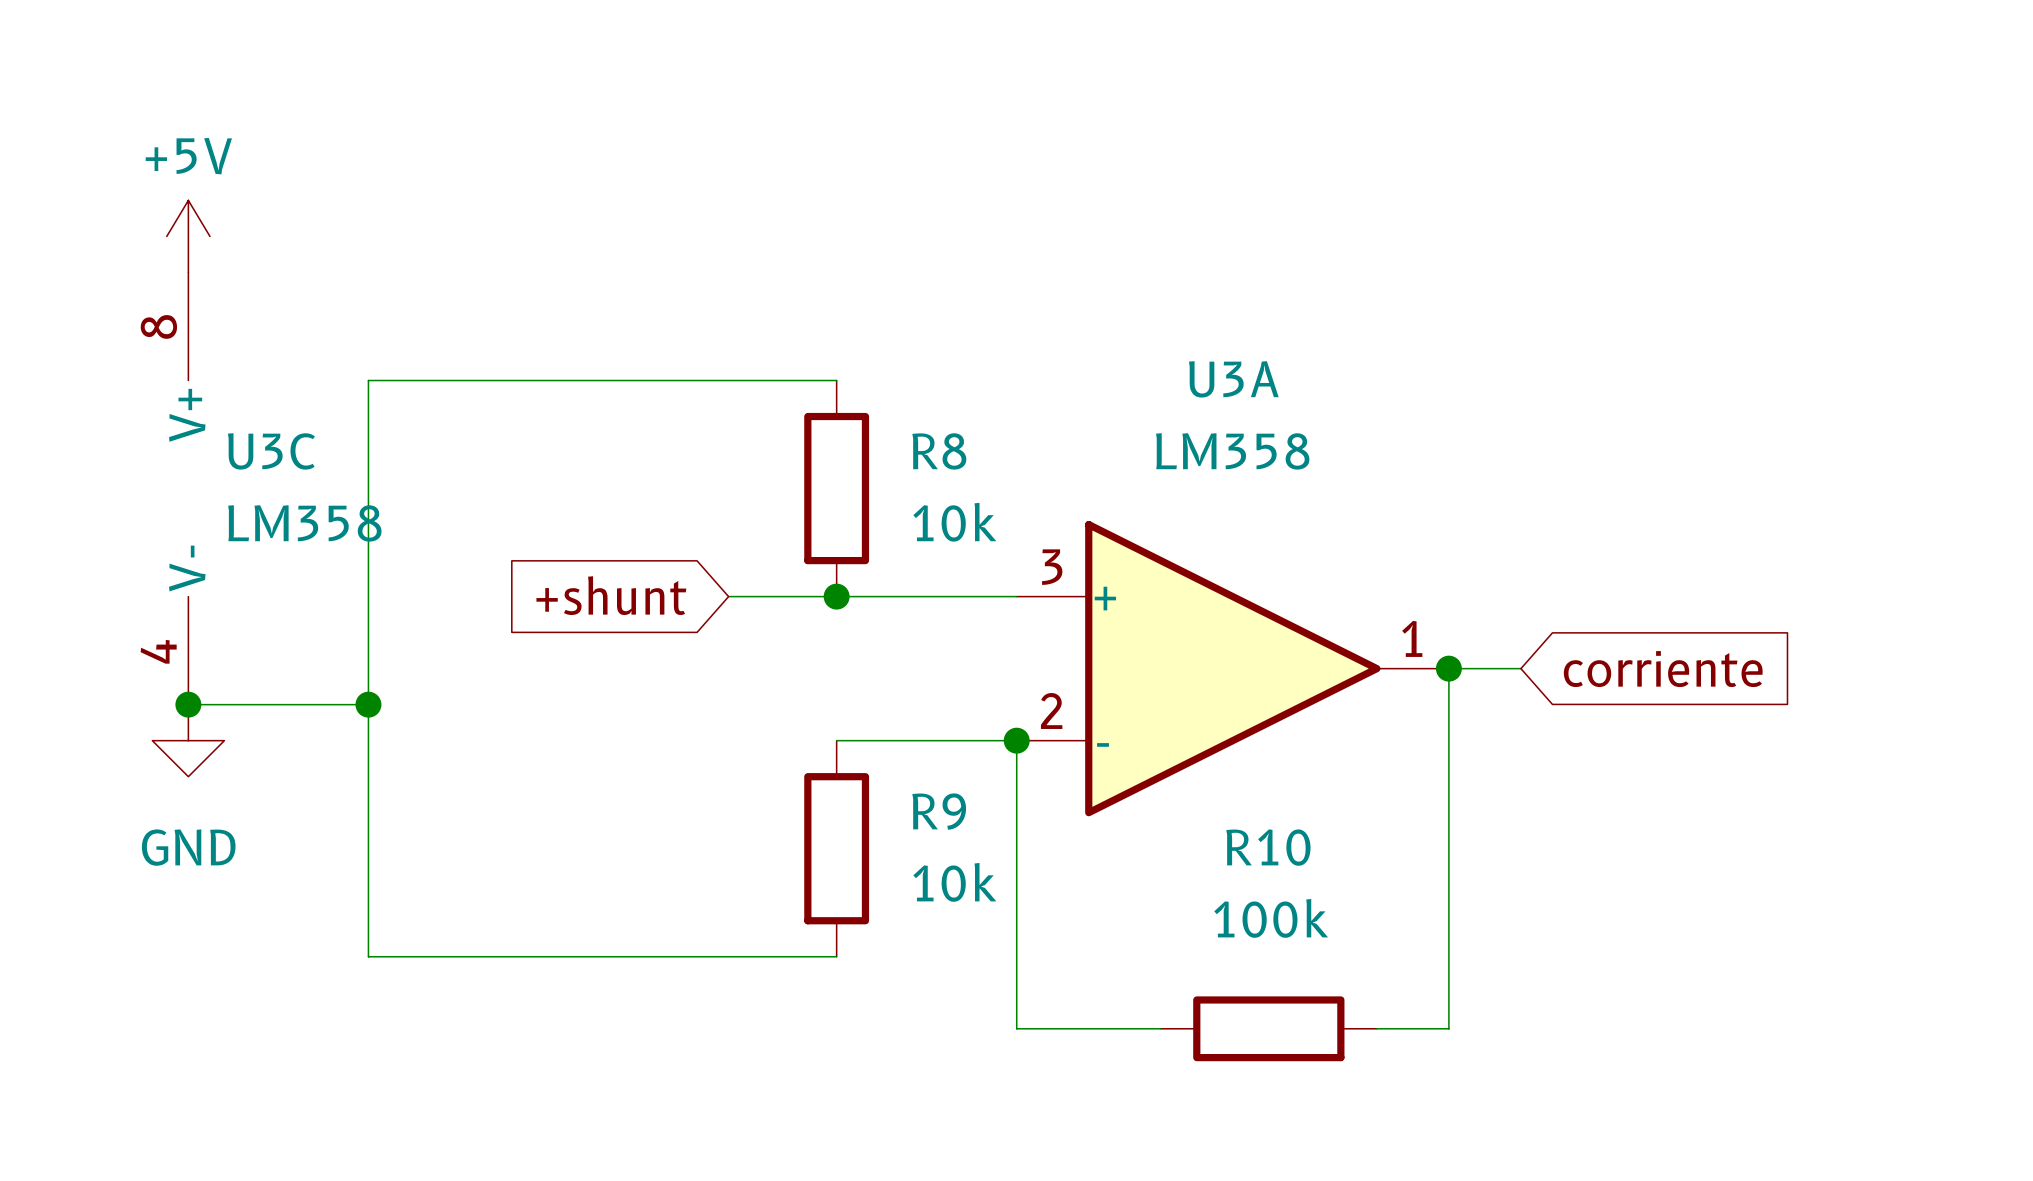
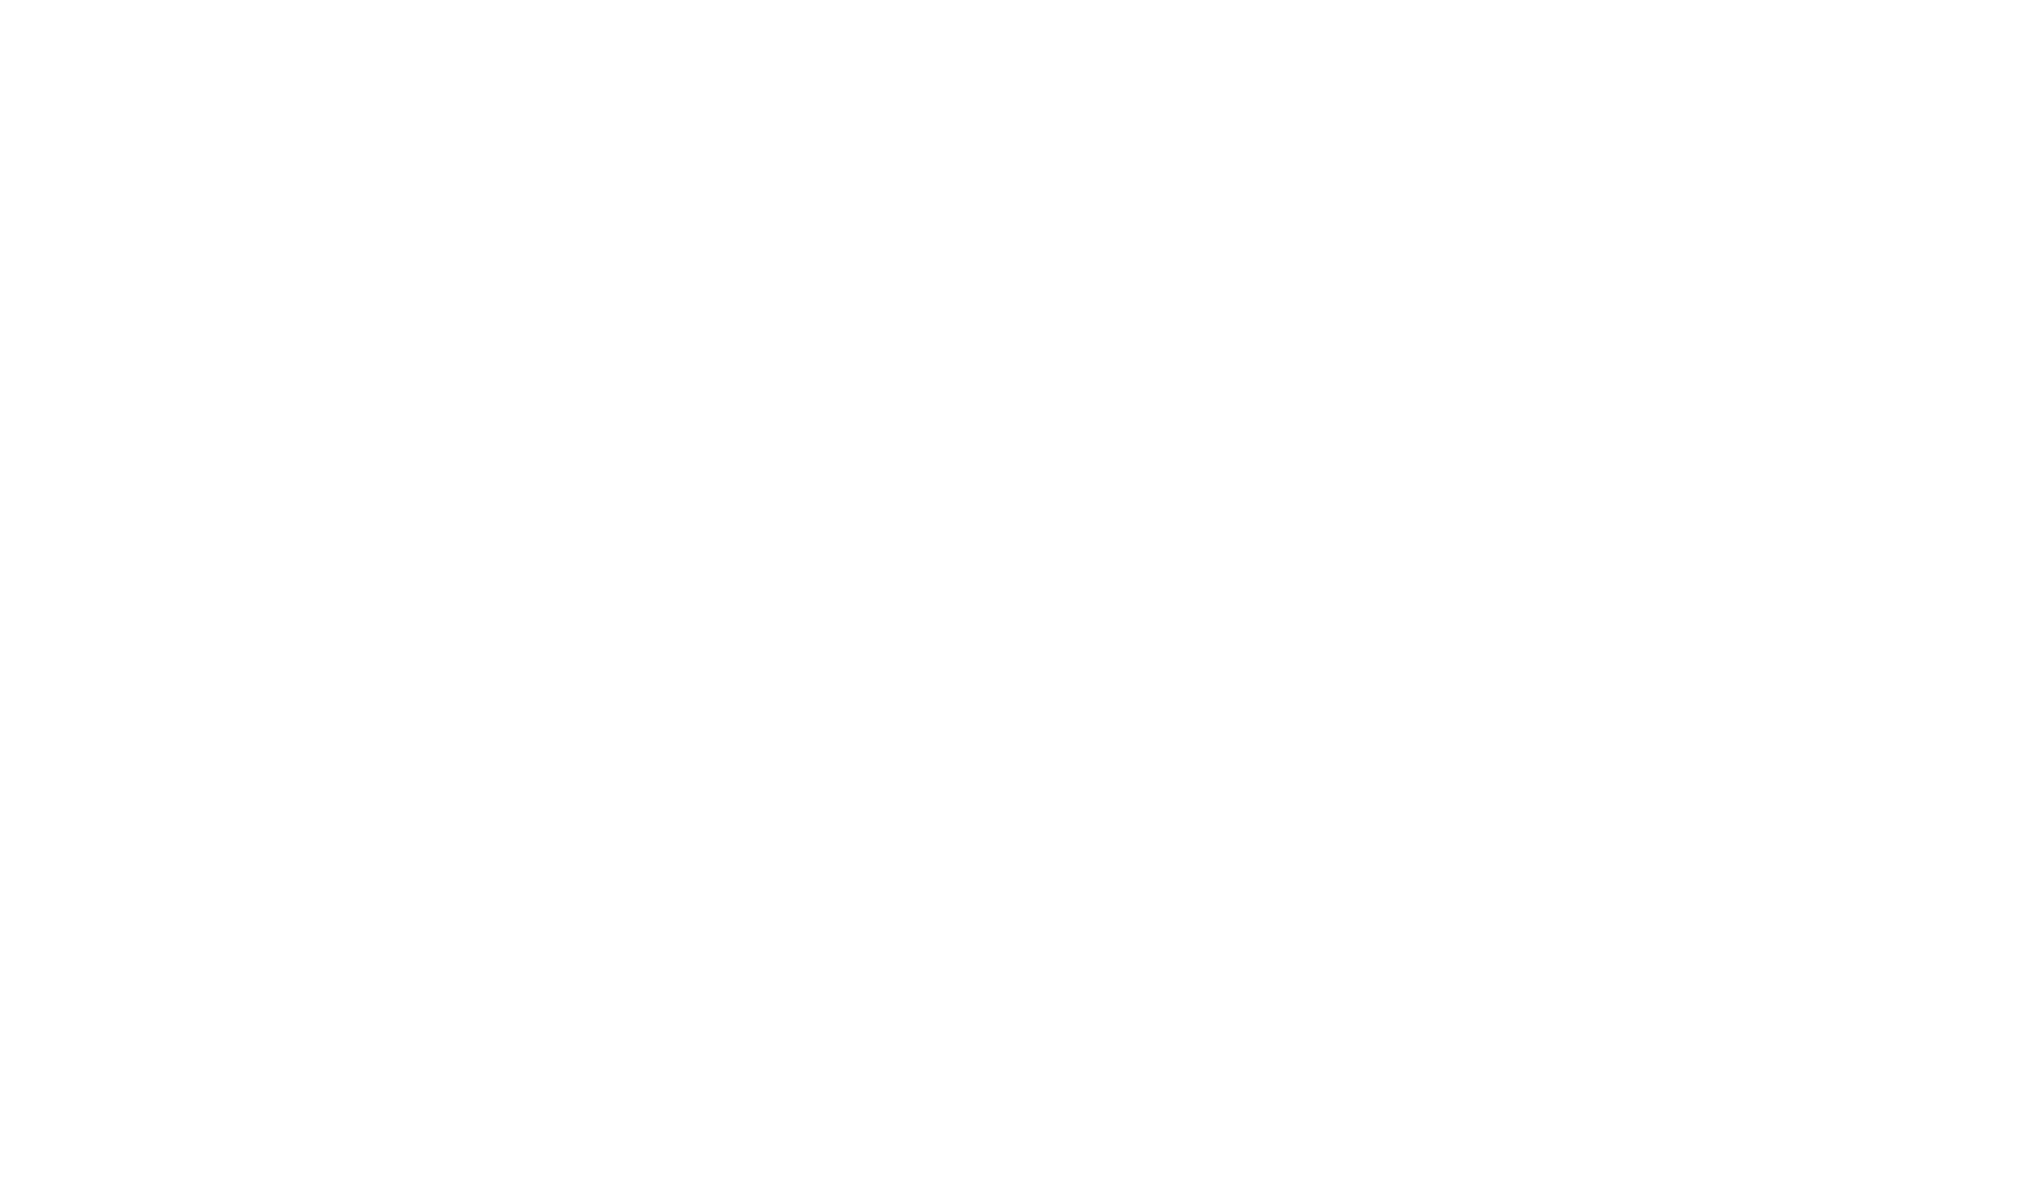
power symbol: +5V (188, 236) -> none
wire: (836, 380) (368, 380) (368, 956) (836, 956) -> none
U3C: LM358 (188, 488) -> none
R8: 10k (836, 488) -> none
global label: +shunt (611, 595) -> none
wire: (728, 596) (1016, 596) -> none
junction: (836, 596) -> none
U3A: LM358 (1232, 668) -> none
junction: (1448, 668) -> none
wire: (1520, 668) (1448, 668) (1448, 1028) (1376, 1028) -> none
global label: corriente (1663, 669) -> none
wire: (188, 704) (368, 704) -> none
junction: (188, 704) -> none
junction: (368, 704) -> none
power symbol: GND (188, 740) -> none
wire: (836, 740) (1016, 740) (1016, 1028) (1160, 1028) -> none
junction: (1016, 740) -> none
R9: 10k (836, 848) -> none
R10: 100k (1268, 1028) -> none

